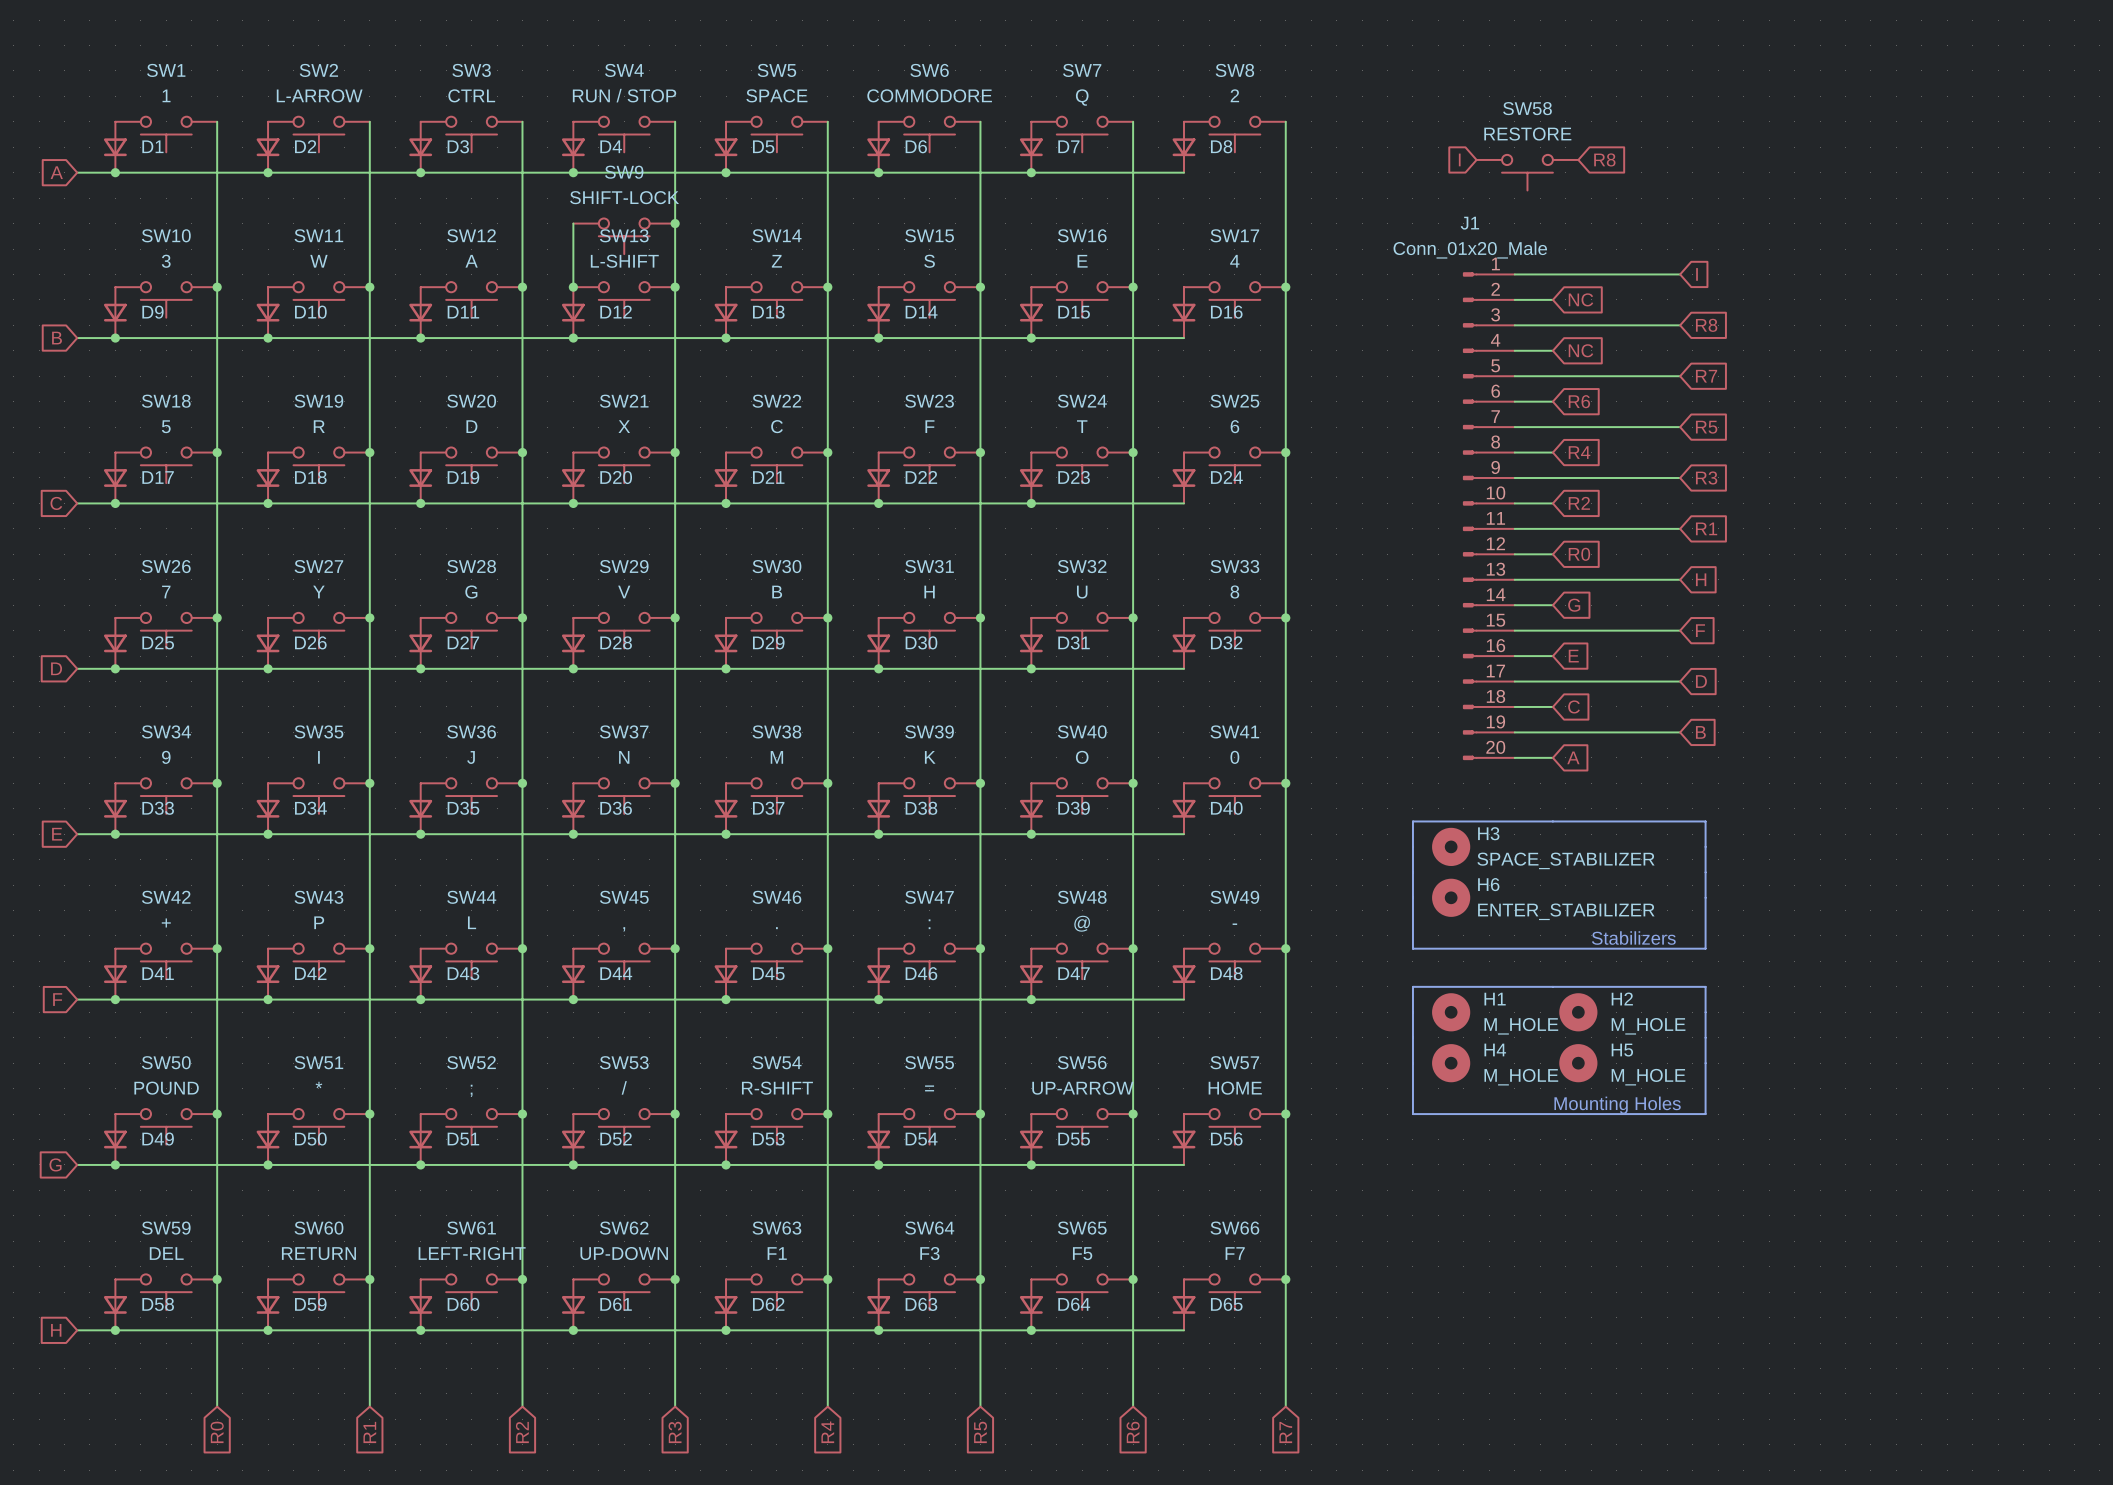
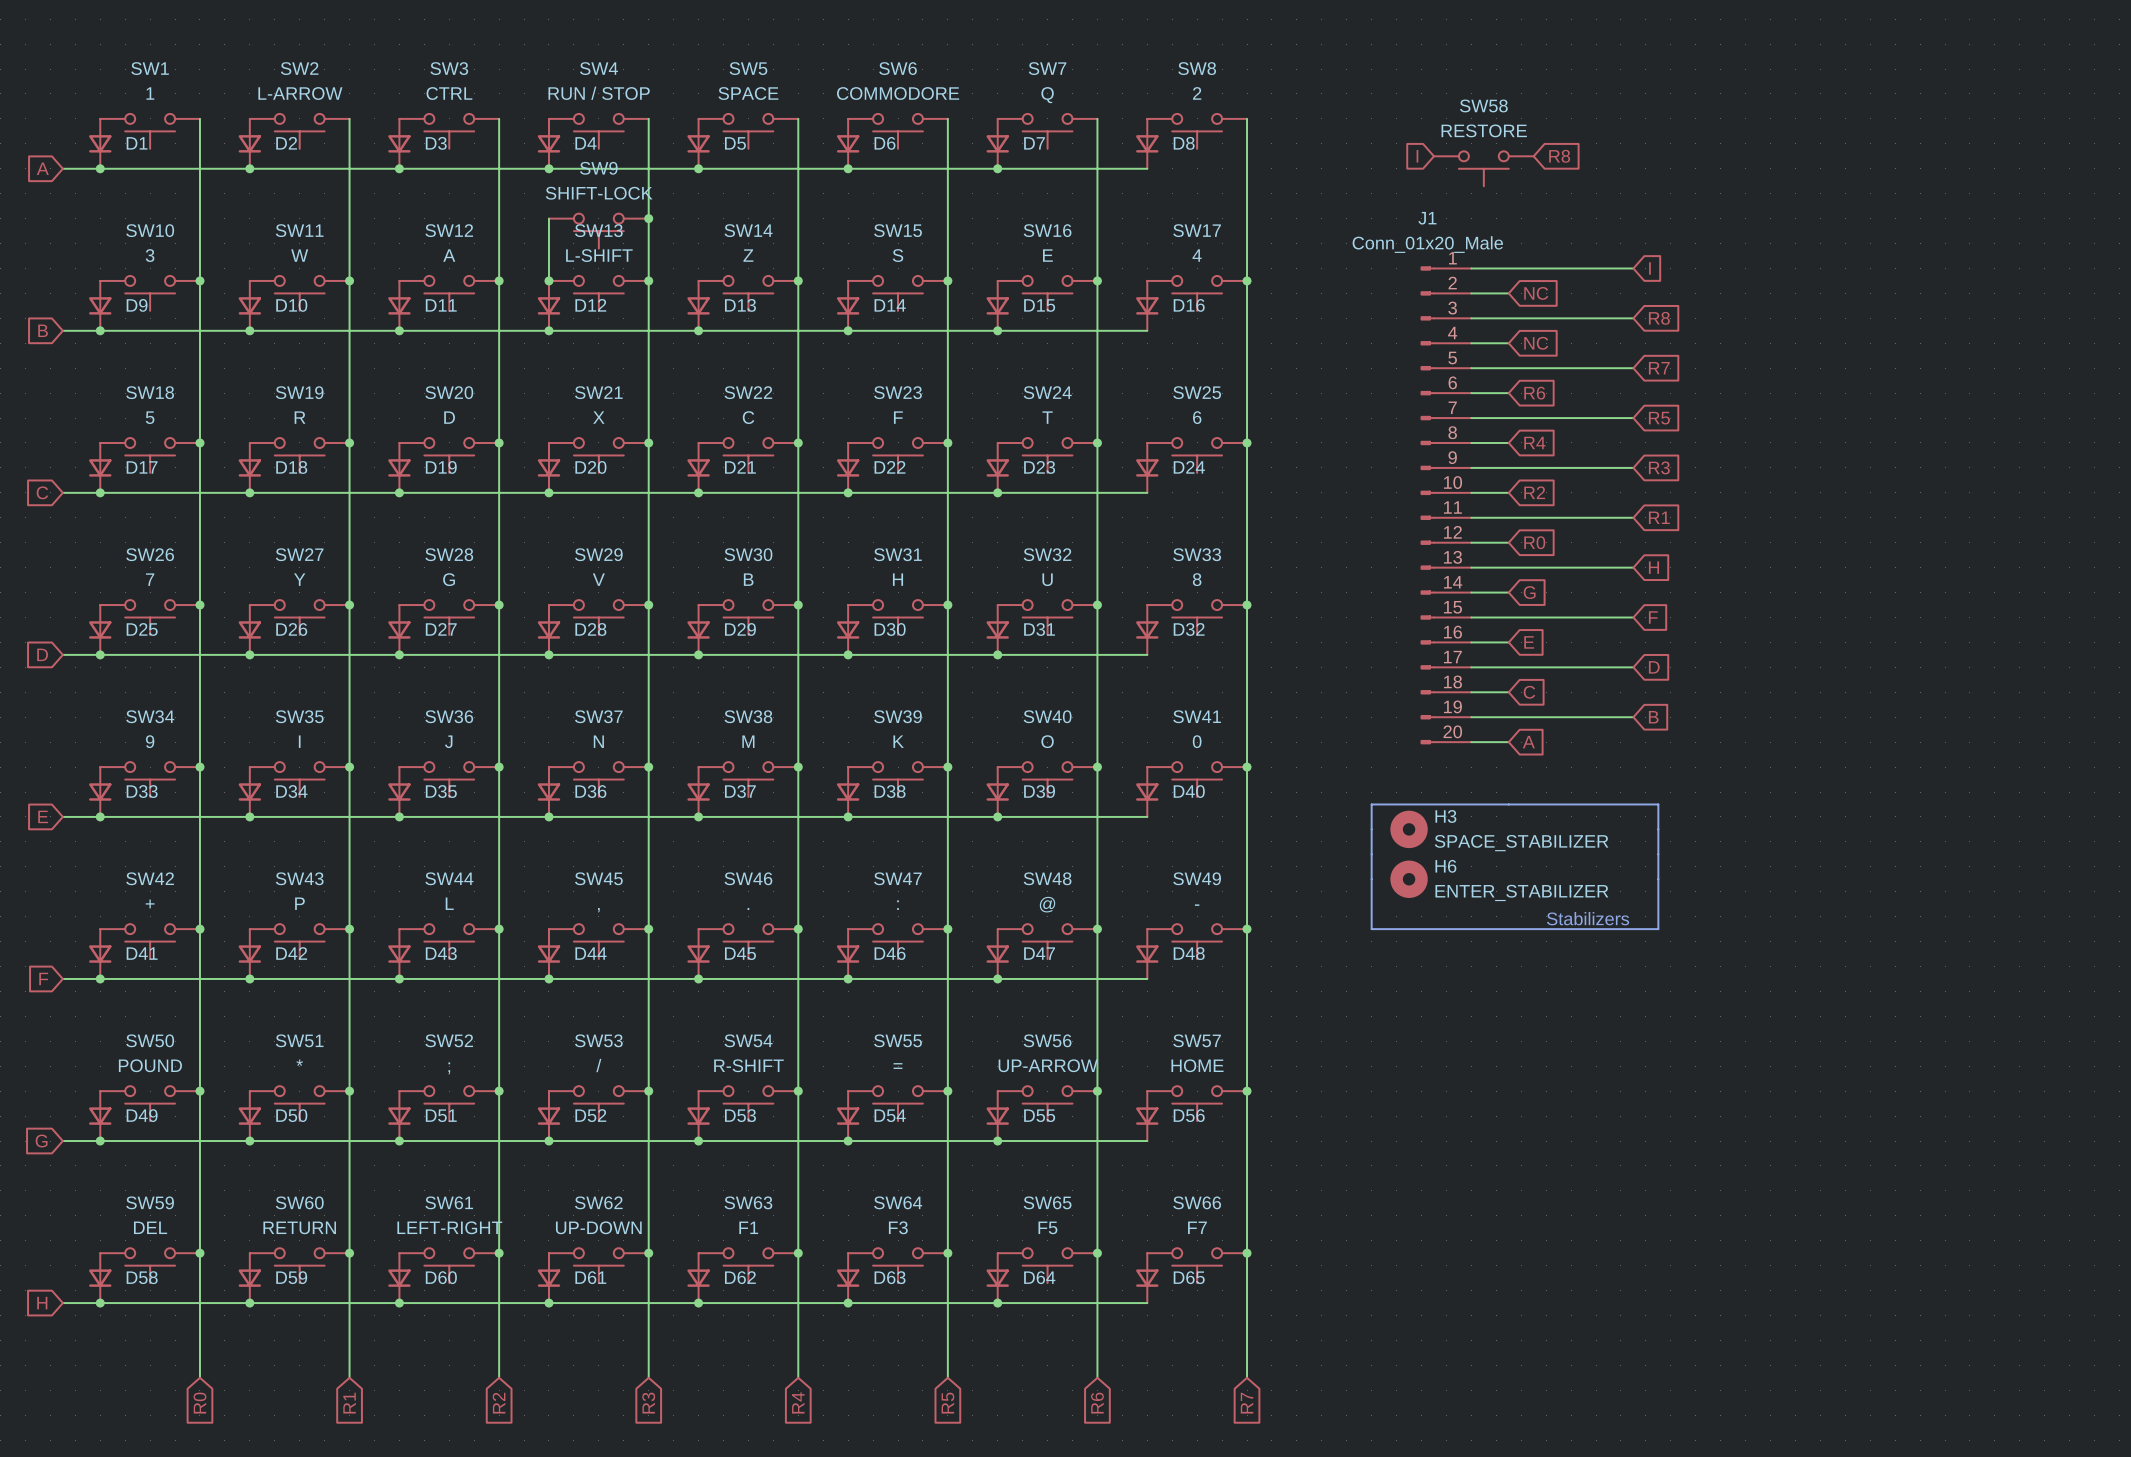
line: (1412, 986) (1705, 986) (1705, 1114) (1412, 1114) (1412, 986) -> none
H1: M_HOLE (1451, 1012) -> none
H2: M_HOLE (1578, 1012) -> none
H4: M_HOLE (1451, 1063) -> none
H5: M_HOLE (1578, 1063) -> none
text: Mounting Holes (1617, 1105) -> none

